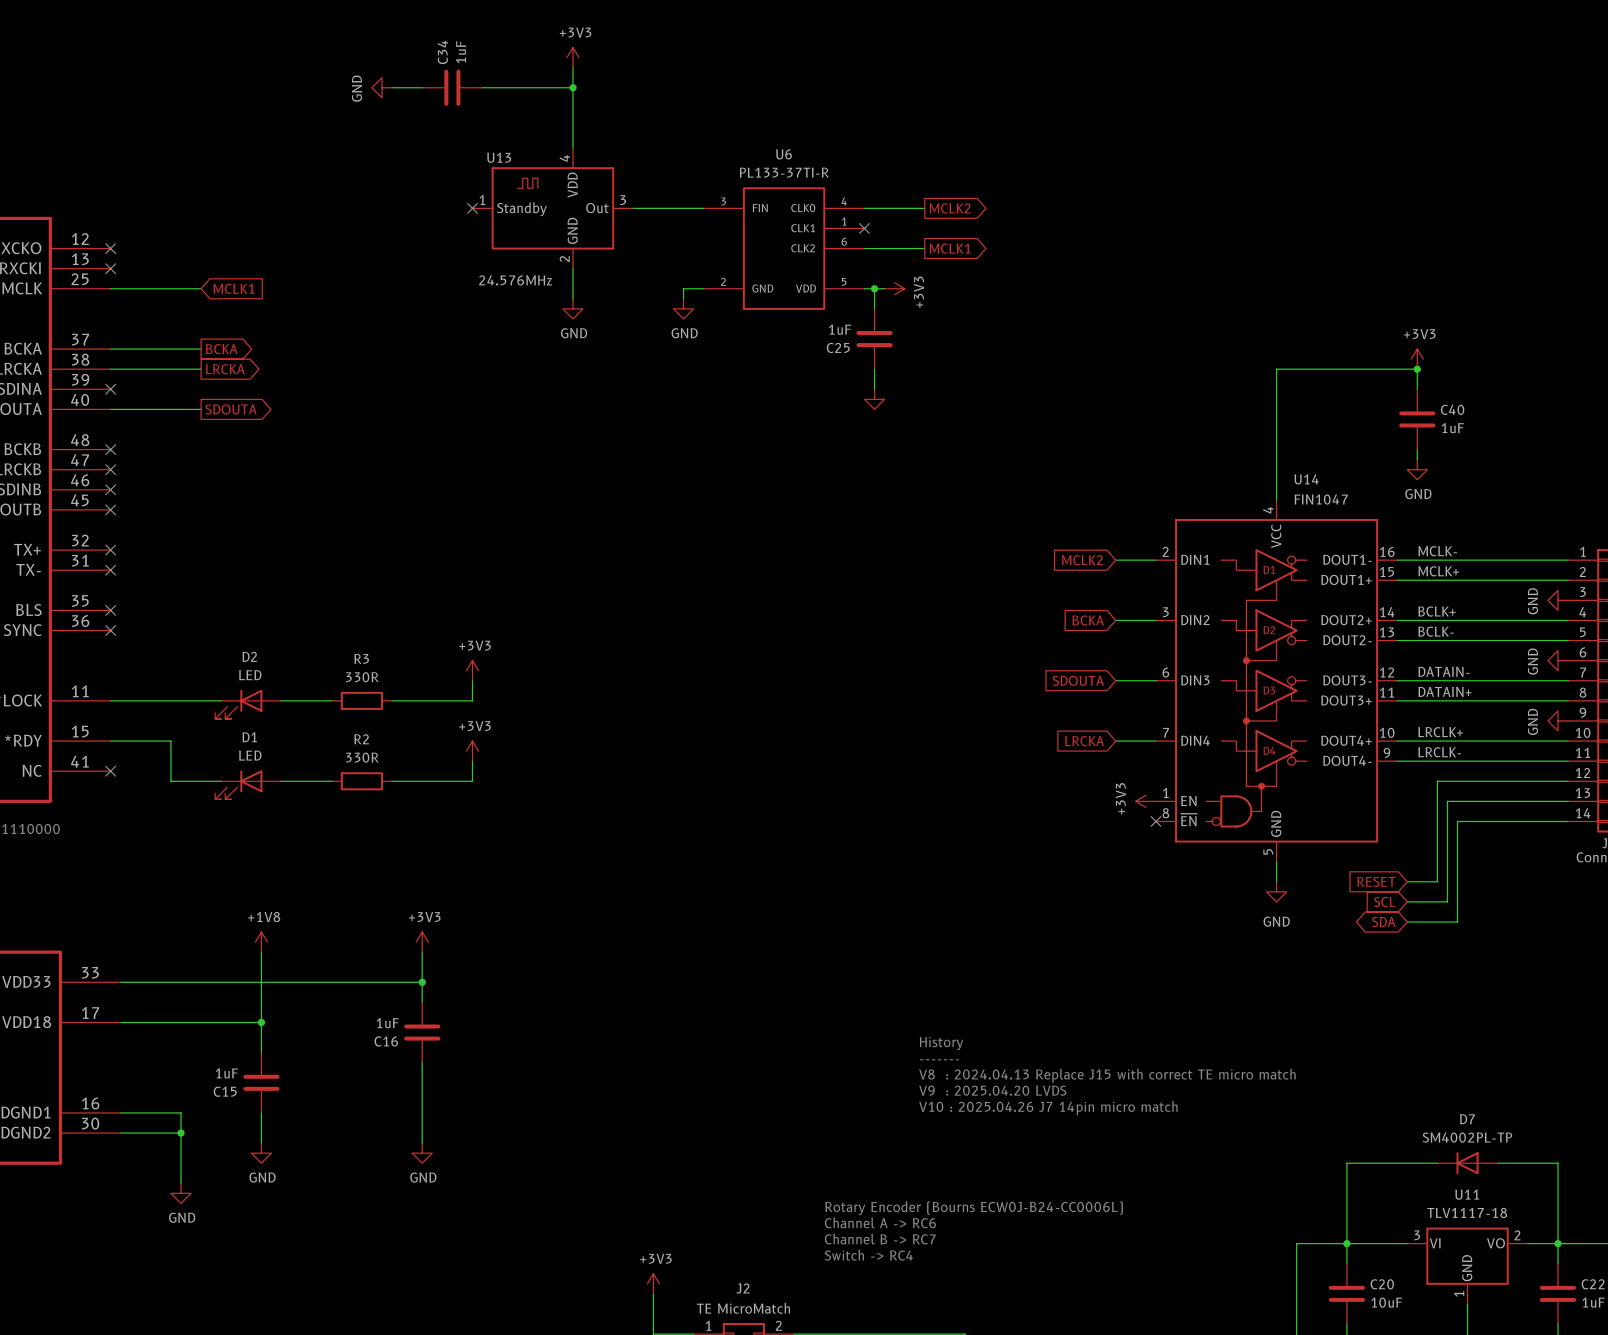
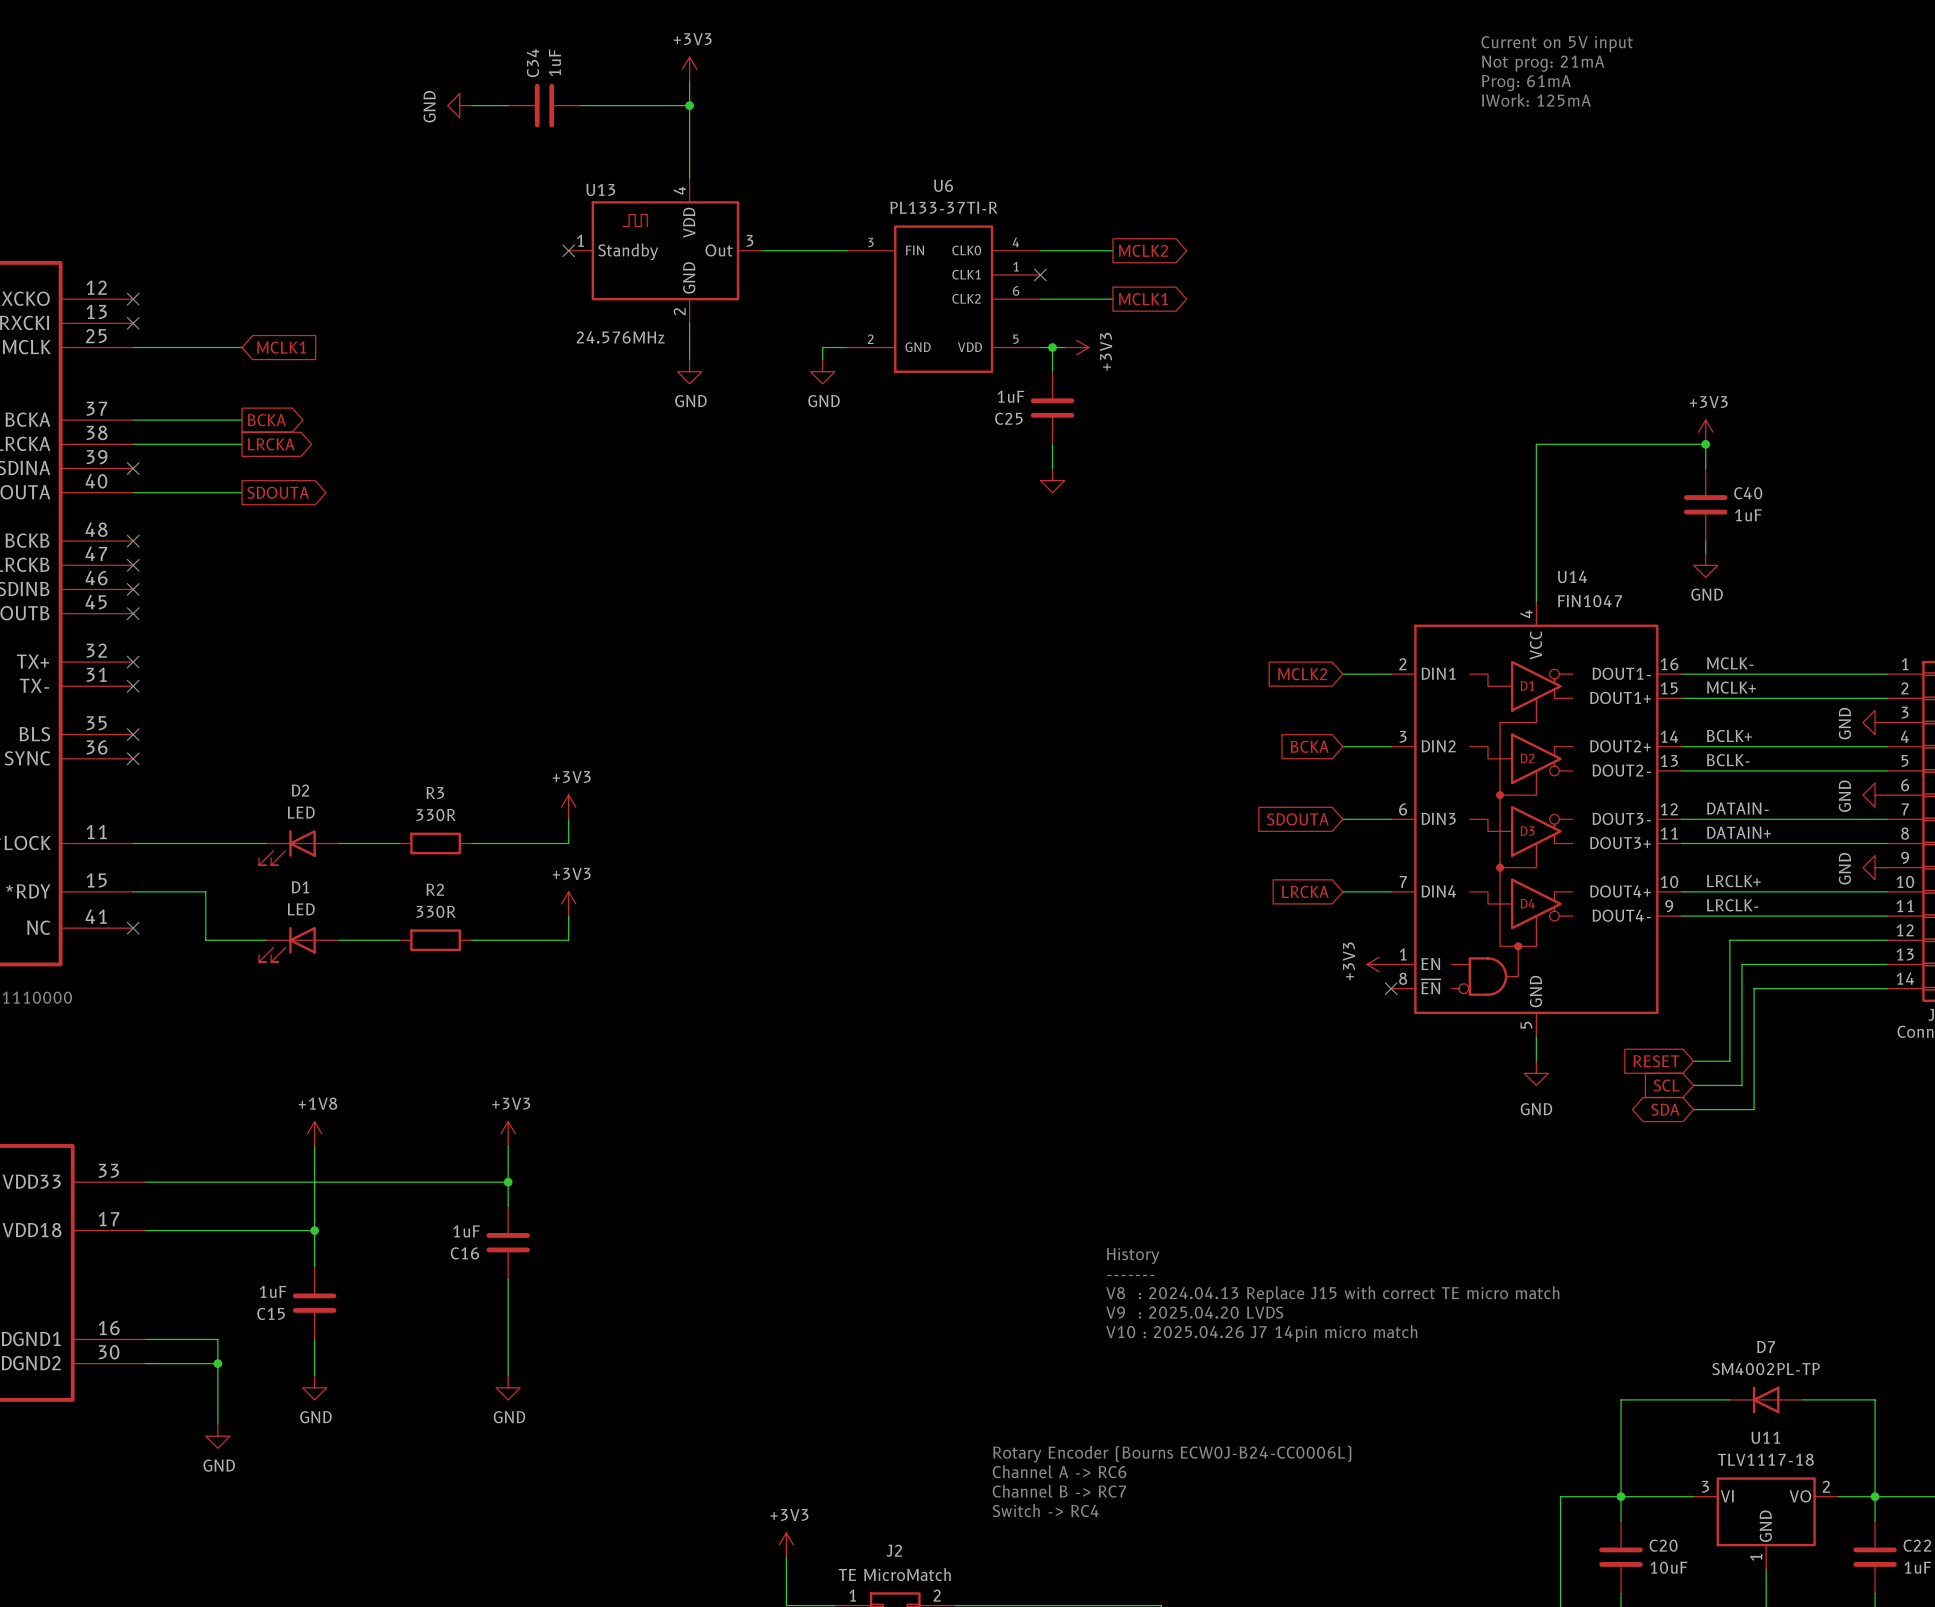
text: none -> Current on 5V input (1557, 44)
text: none -> Not prog: 21mA (1543, 63)
text: none -> Prog: 61mA (1526, 83)
text: none -> IWork: 125mA (1536, 100)

